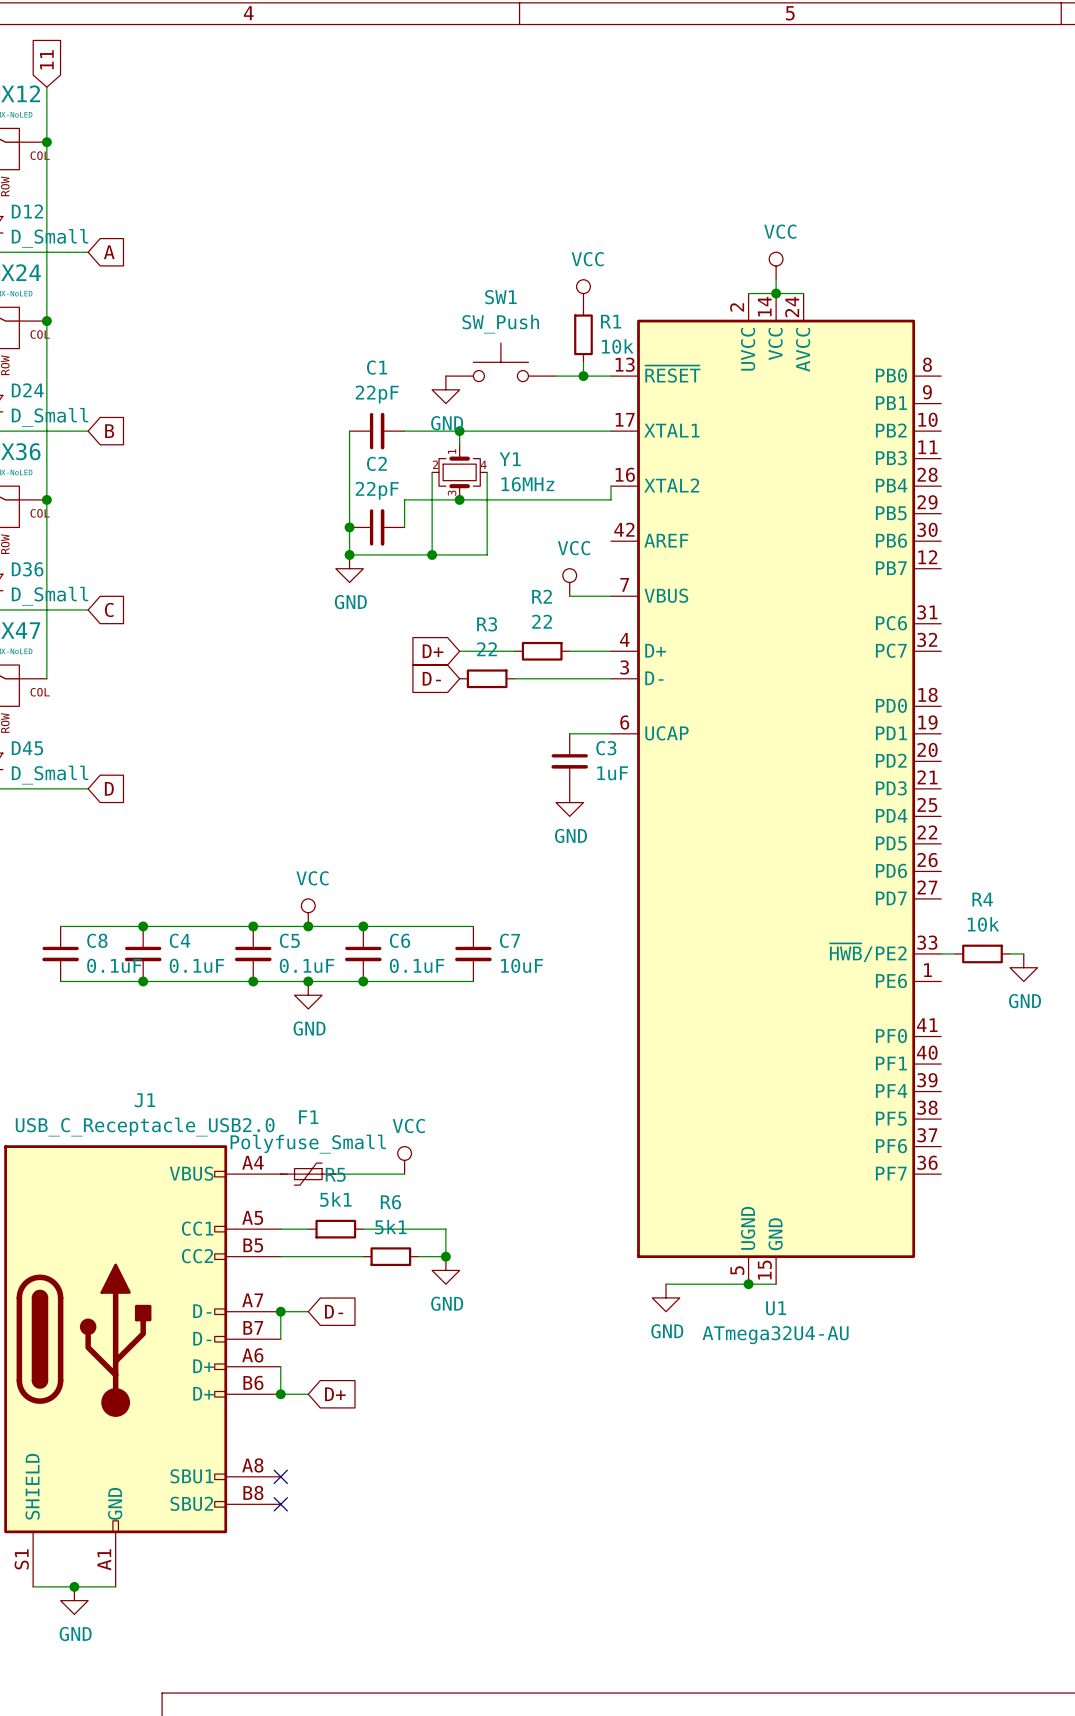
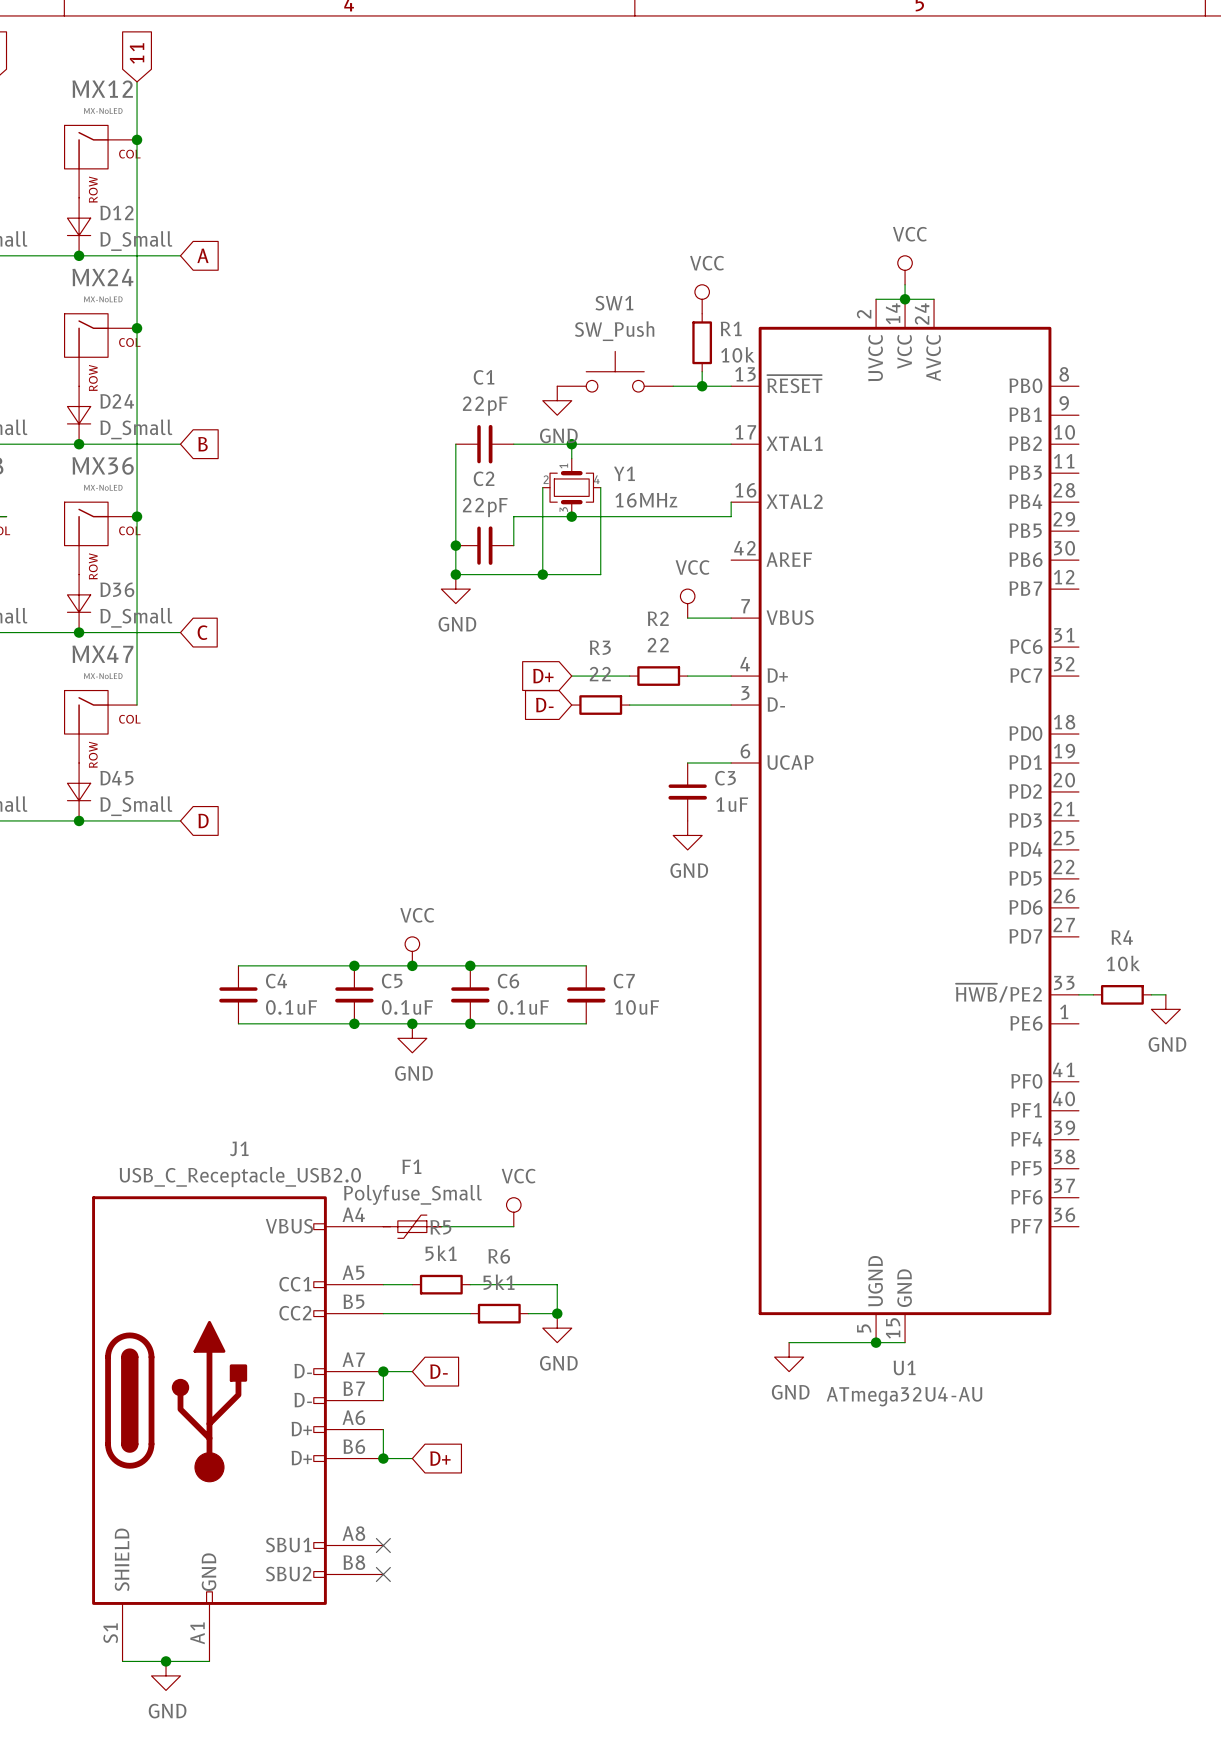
wire: (60, 926) (143, 926) -> none
junction: (143, 926) -> none
C8: 0.1uF (60, 953) -> none
wire: (60, 981) (143, 981) -> none
junction: (143, 981) -> none

